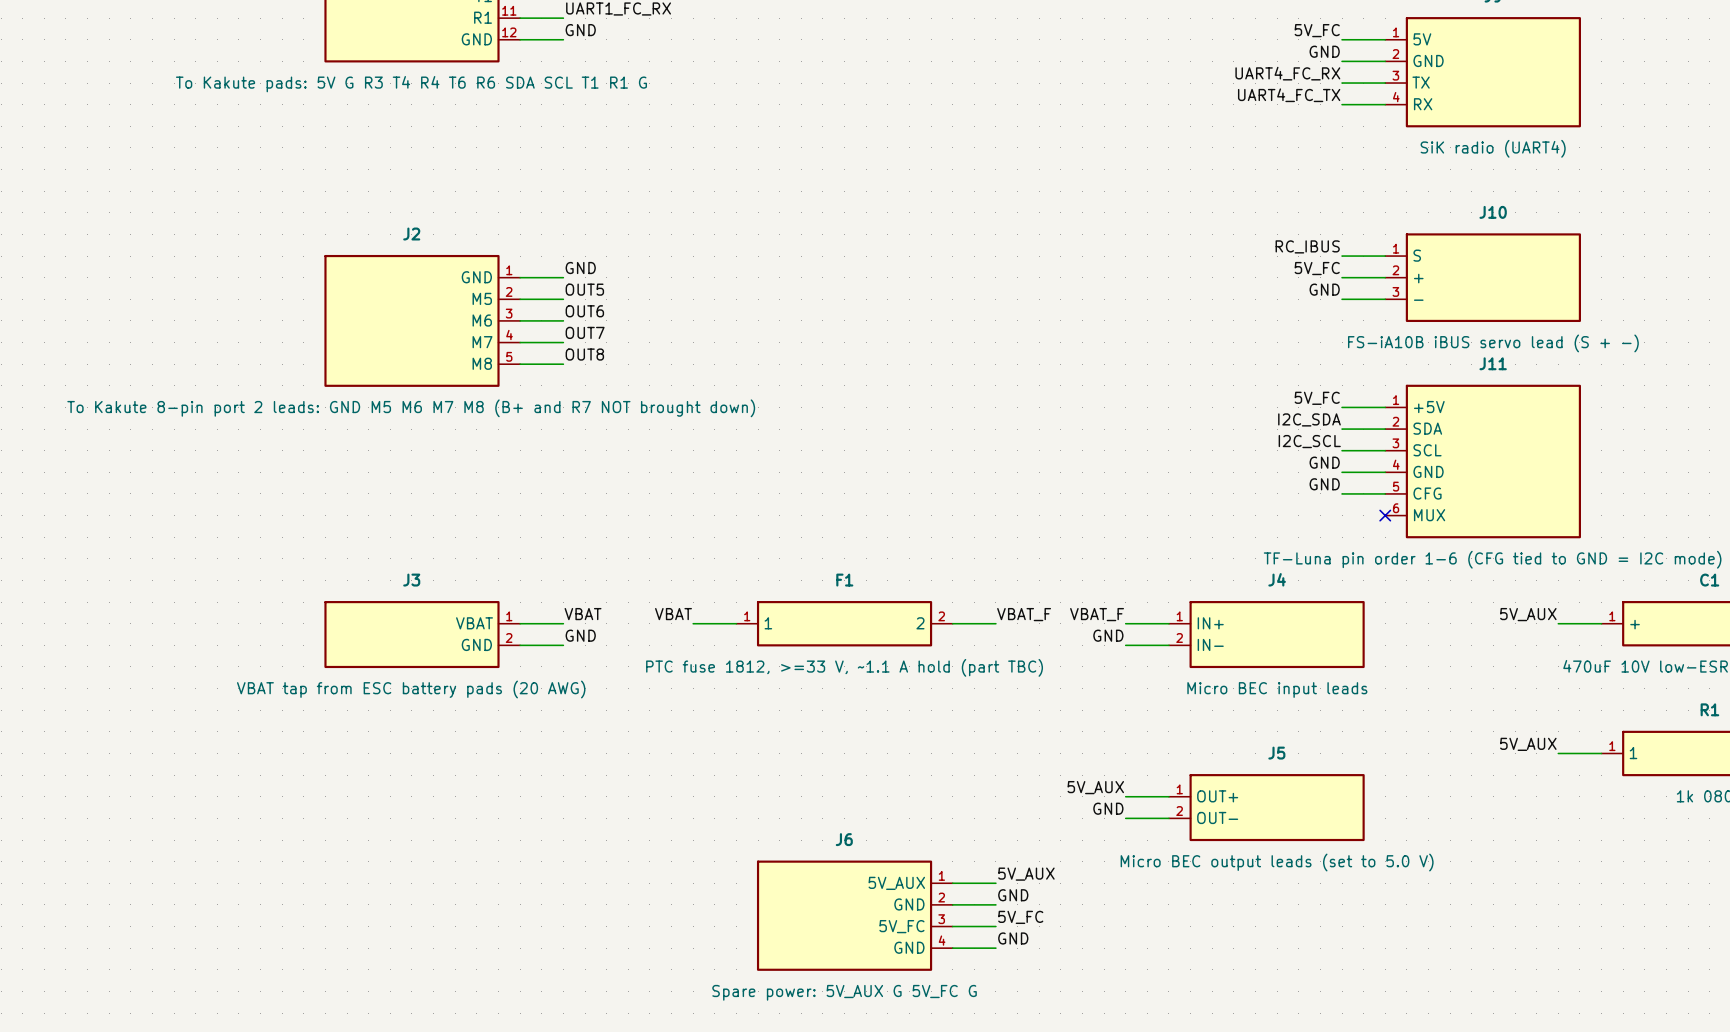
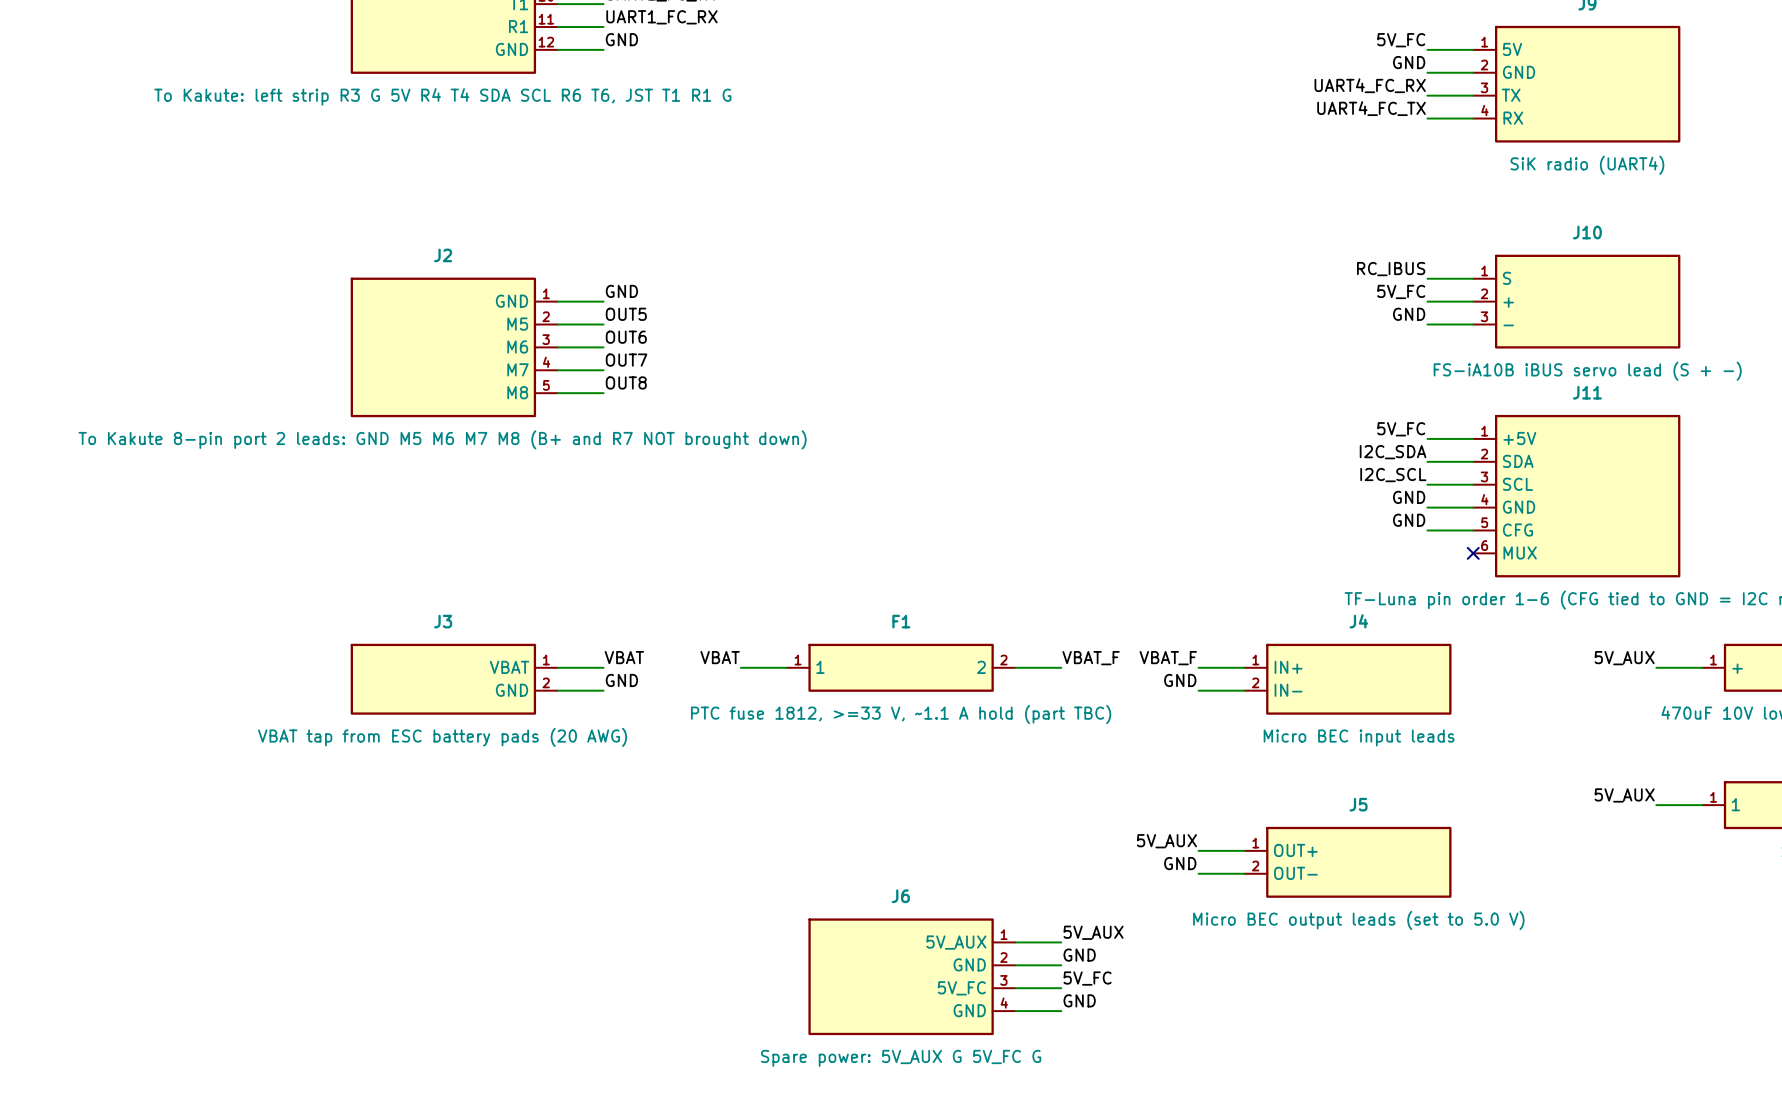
part value: To Kakute pads: 5V G R3 T4 R4 T6 R6 SDA SCL T1 R1 G (411, 84) -> To Kakute: left strip R3 G 5V R4 T4 SDA SCL R6 T6, JST T1 R1 G (442, 96)

